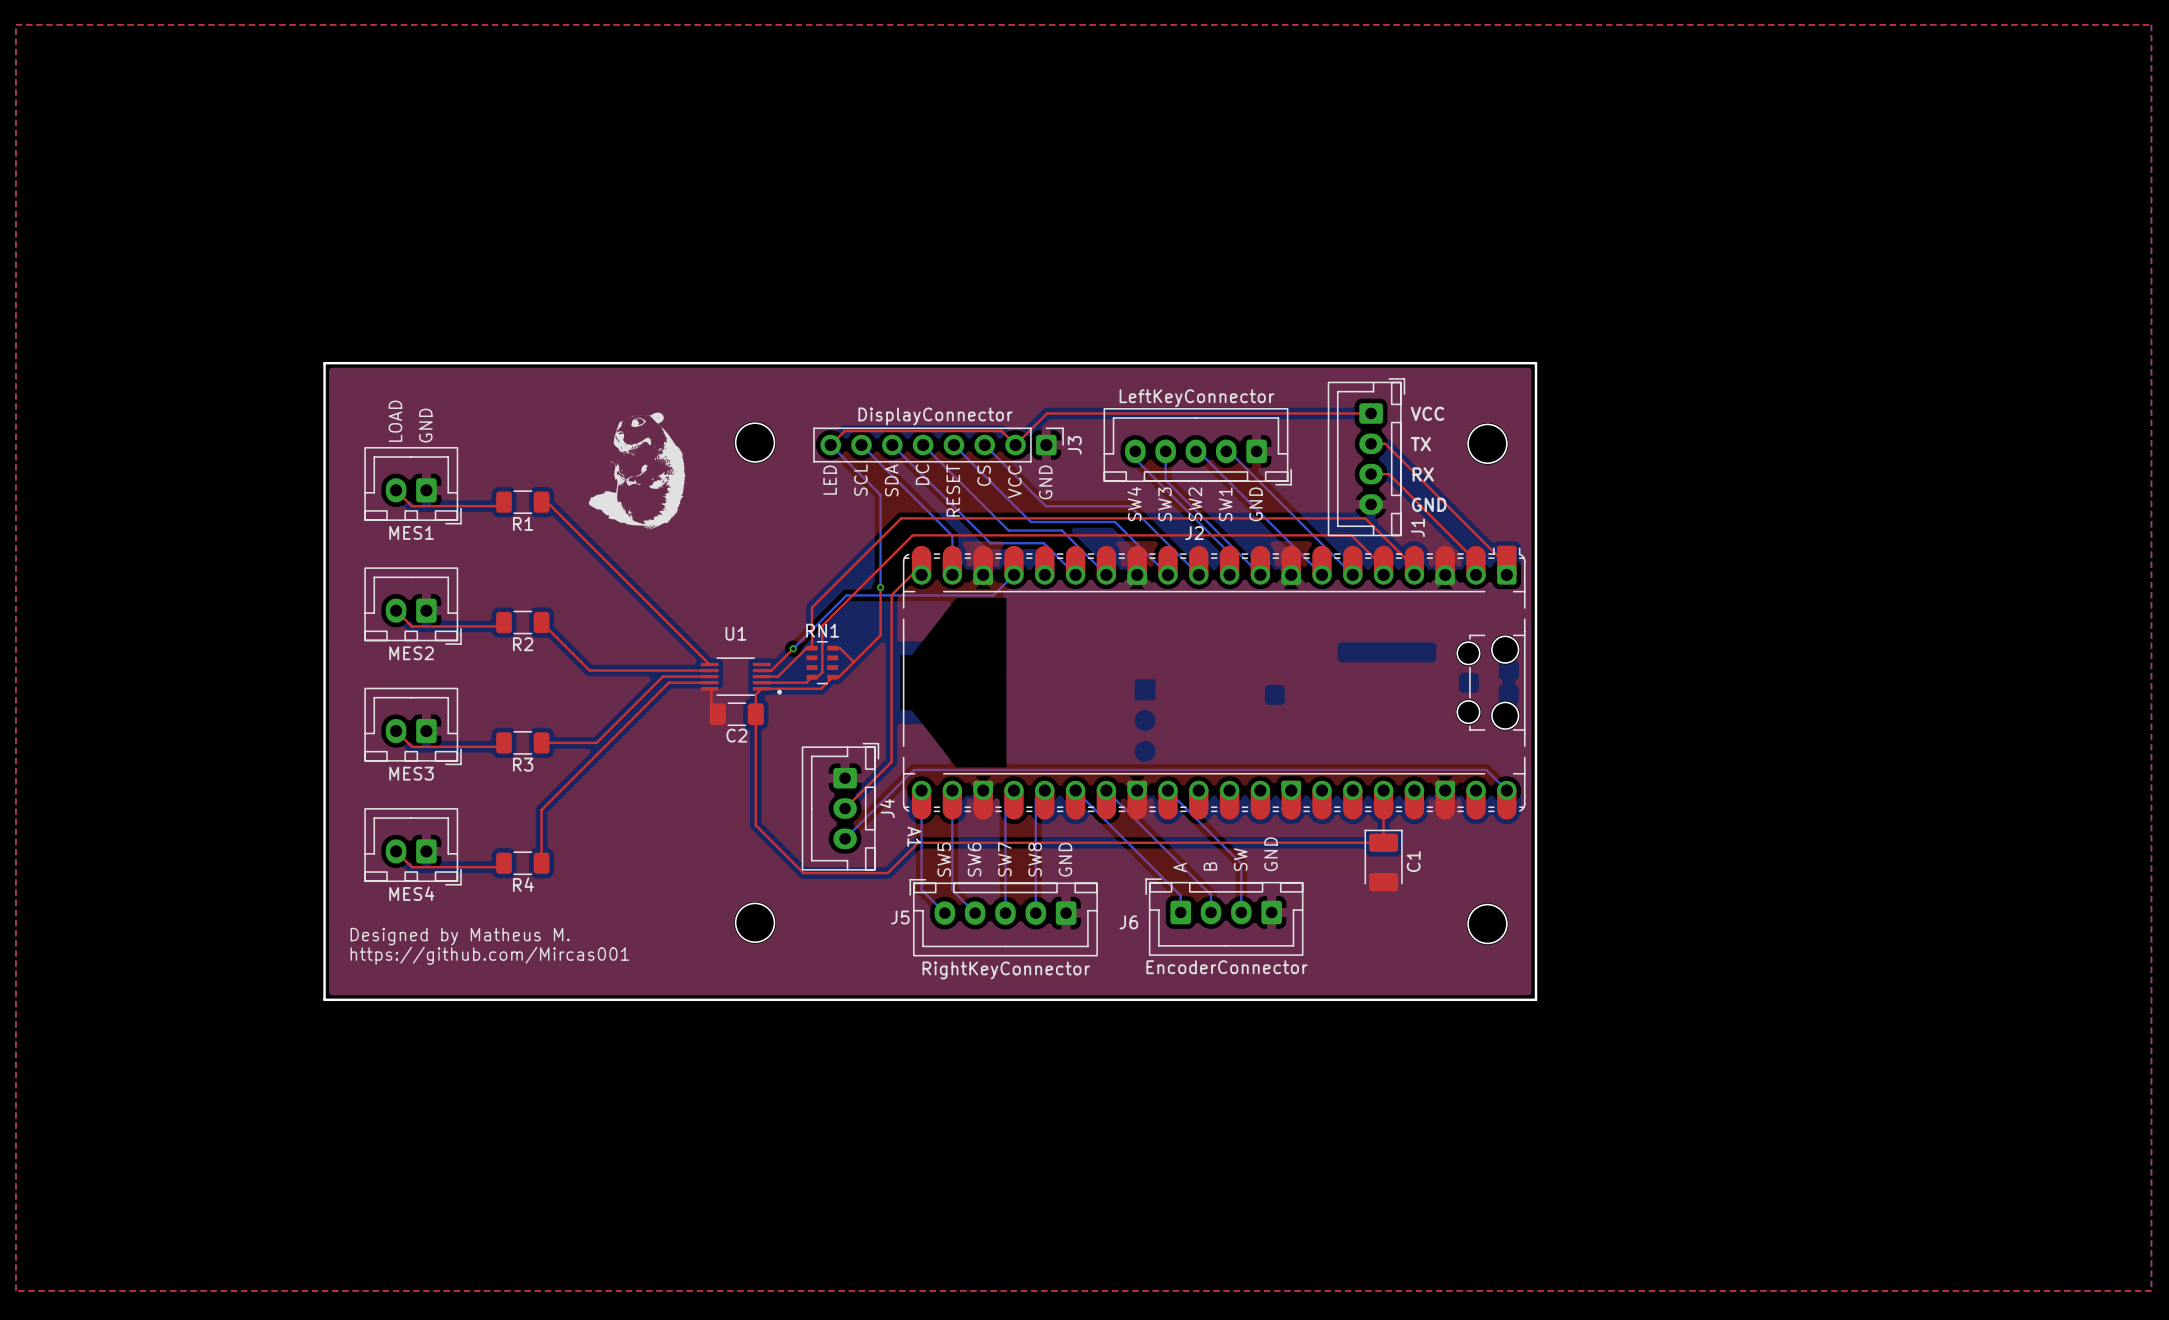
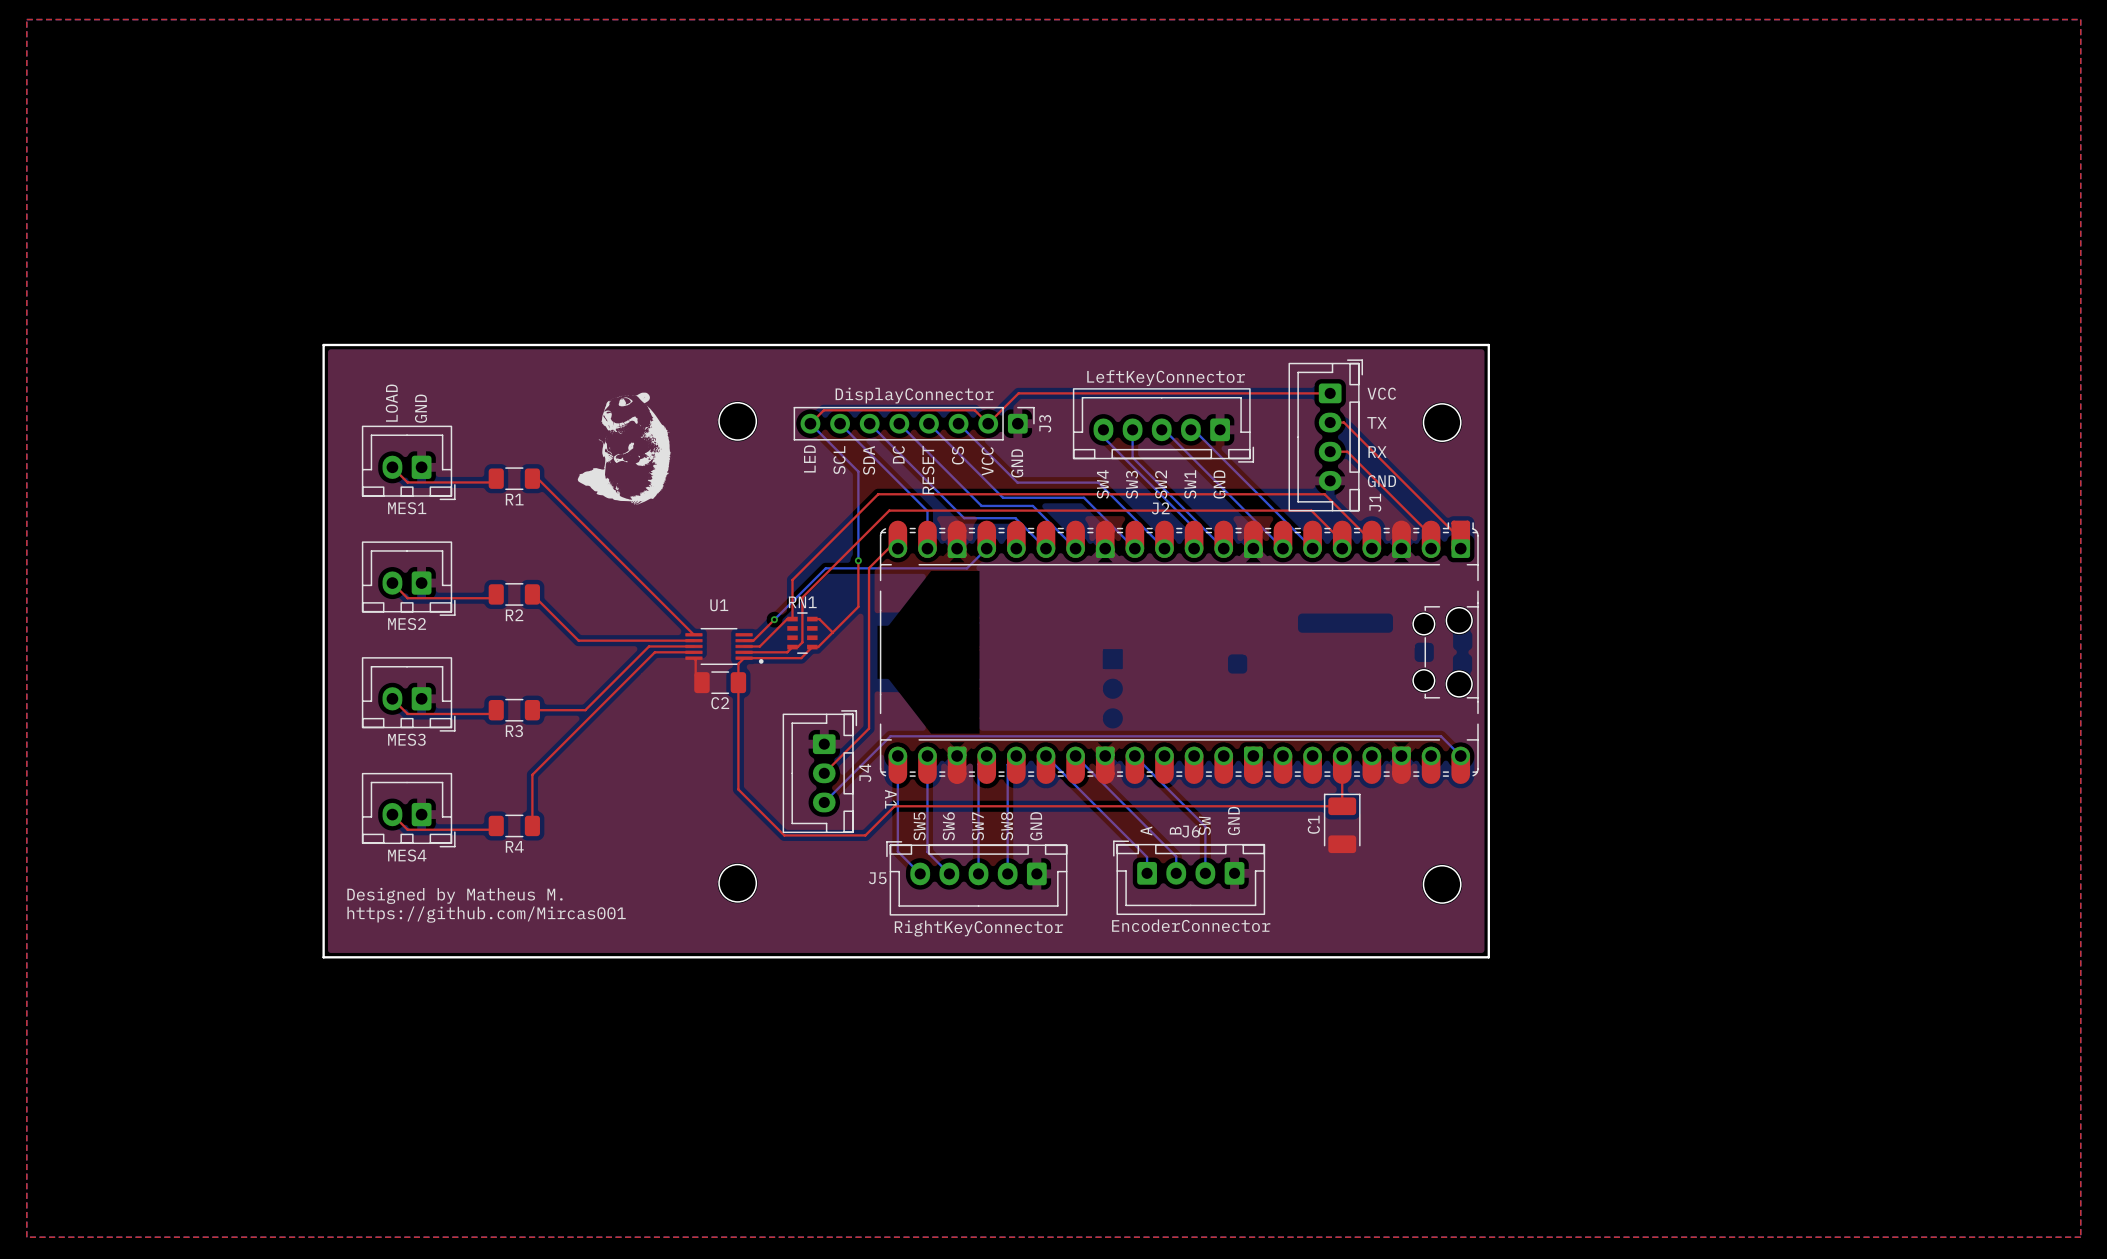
C1 name position: C1 (1413, 861) -> C1 (1313, 824)
J6 name position: J6 (1128, 922) -> J6 (1190, 831)

